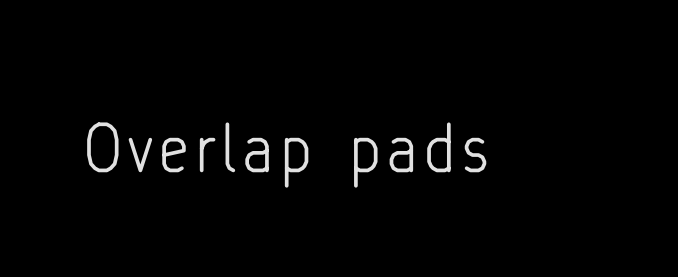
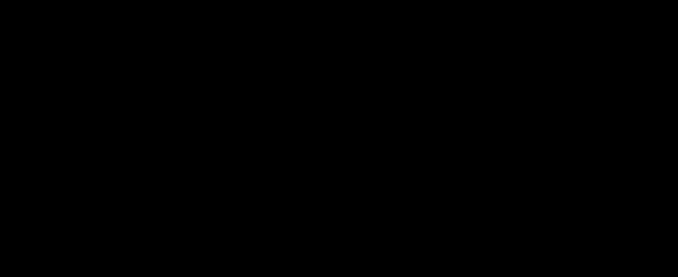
text: Overlap pads (286, 155) -> none

